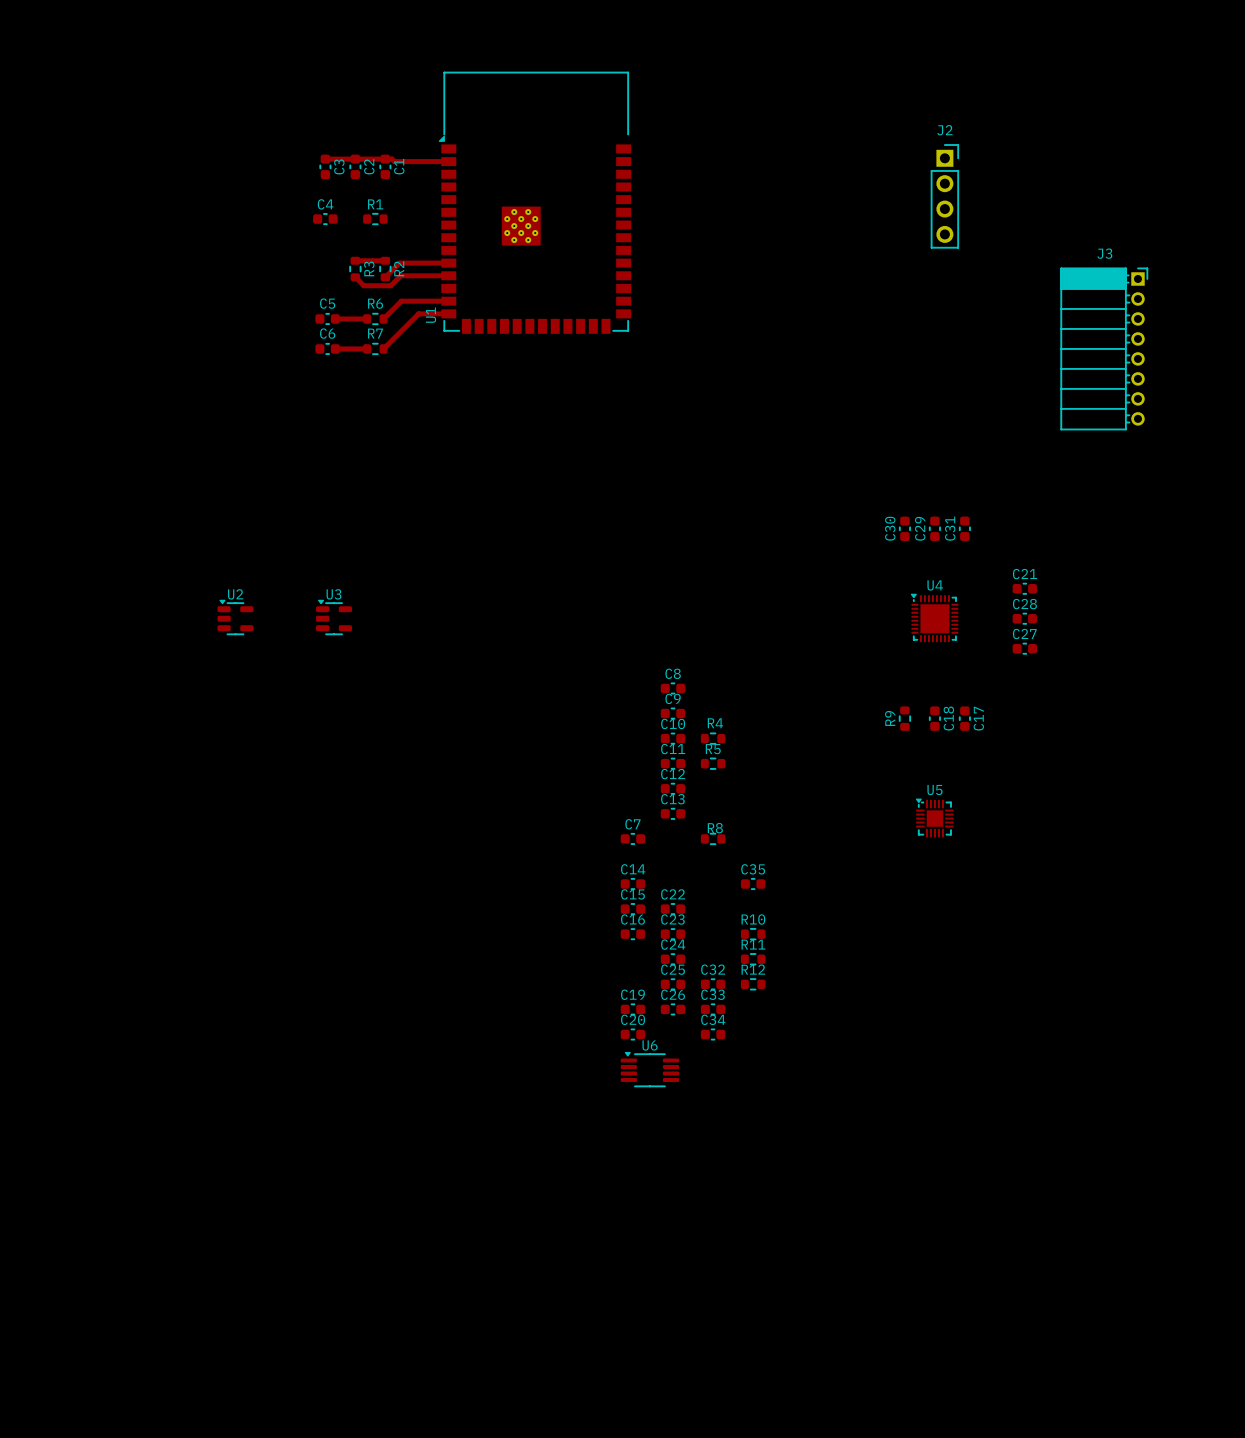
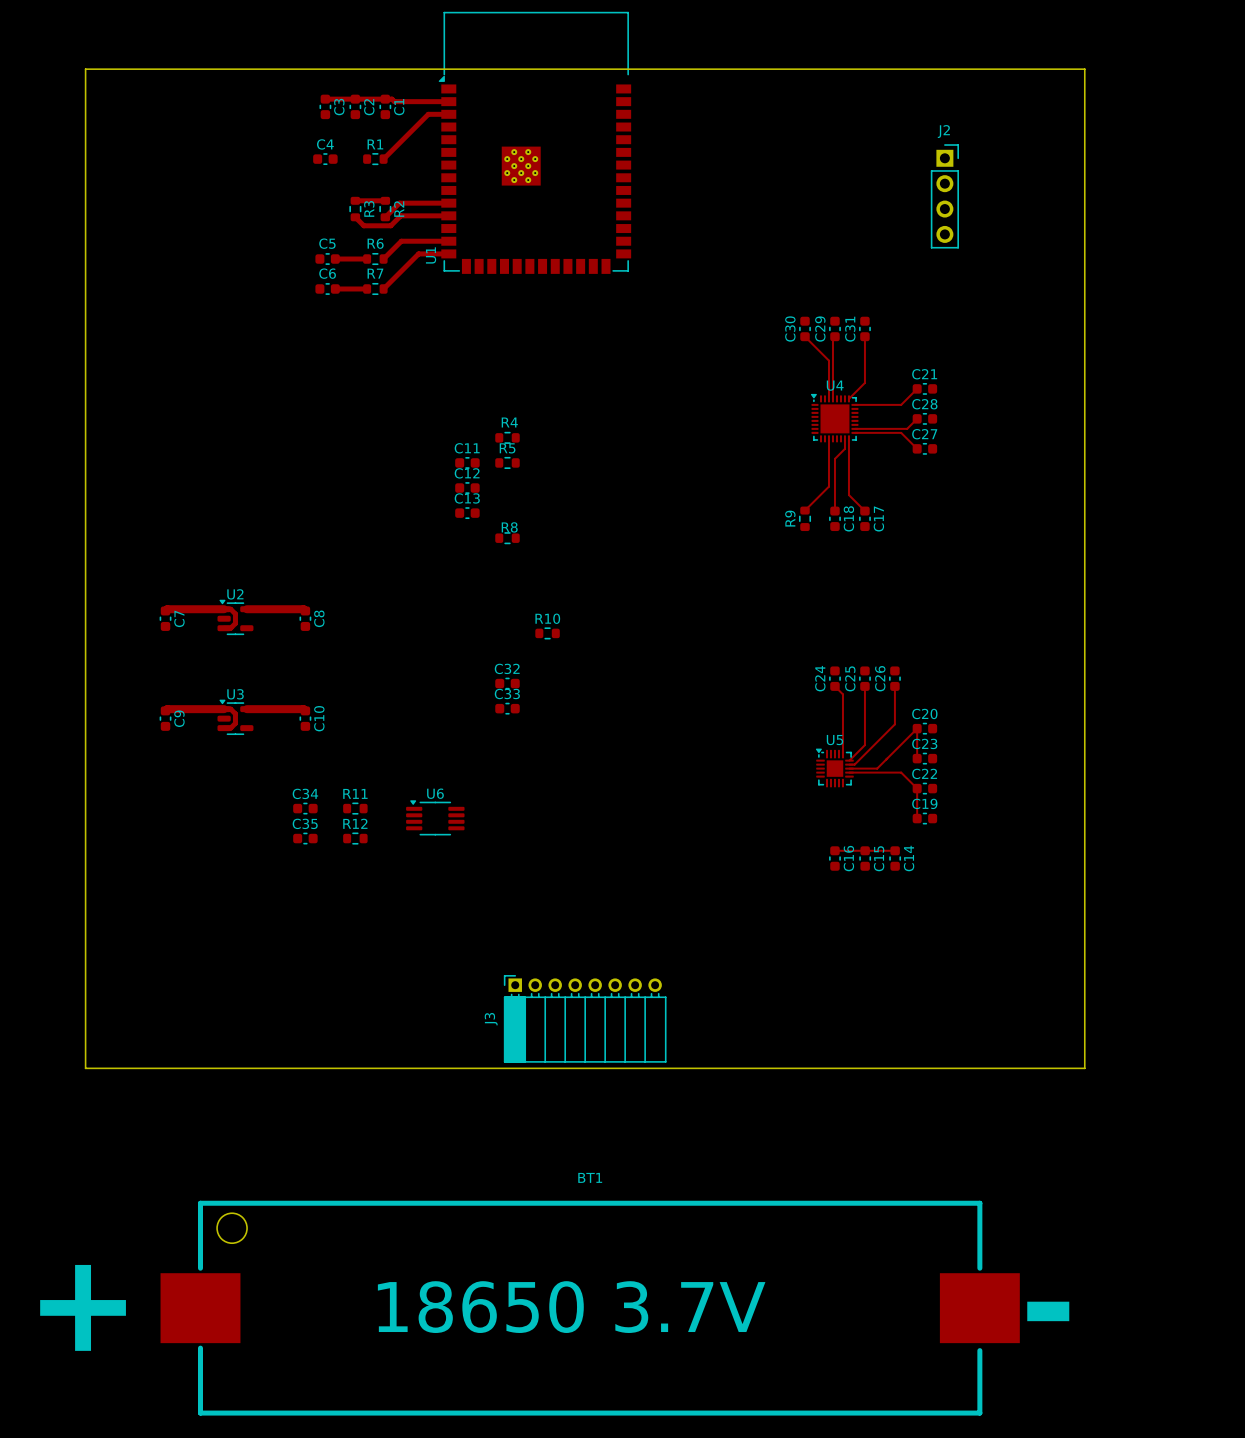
board edge: none -> (85, 69) (1084, 69) (1084, 1068) (85, 1068) (85, 69)
top track: none -> (448, 114) (428, 114) (383, 159)
top track: (325, 159) (448, 161) -> (325, 99) (448, 101)
C3 position: (325, 166) -> (325, 106)
C2 position: (355, 166) -> (355, 106)
C1 position: (385, 166) -> (385, 106)
U1 position: (534, 202) -> (534, 142)
C4 position: (325, 219) -> (325, 159)
R1 position: (375, 219) -> (375, 159)
top track: (355, 260) (385, 260) -> (355, 200) (385, 200)
top track: (448, 263) (399, 263) (385, 277) -> (448, 203) (399, 203) (385, 217)
R3 position: (355, 269) -> (355, 209)
R2 position: (385, 269) -> (385, 209)
top track: (448, 275) (400, 275) (390, 285) (363, 285) (355, 277) -> (448, 215) (400, 215) (390, 225) (363, 225) (355, 217)
top track: (448, 301) (401, 301) (383, 318) -> (448, 241) (401, 241) (383, 259)
top track: (448, 313) (418, 313) (383, 348) -> (448, 253) (418, 253) (383, 288)
C5 position: (327, 318) -> (327, 259)
top track: (335, 318) (367, 318) -> (335, 259) (367, 259)
R6 position: (375, 318) -> (375, 259)
top track: none -> (805, 336) (828, 360) (828, 398)
top track: none -> (834, 336) (832, 338) (832, 398)
top track: none -> (864, 336) (864, 382) (848, 398)
C6 position: (327, 348) -> (327, 288)
top track: (335, 348) (367, 348) -> (335, 288) (367, 288)
R7 position: (375, 348) -> (375, 288)
J3 rotation: 0° (1104, 348) -> 90° counterclockwise (585, 1018)
J3 position: (1104, 348) -> (585, 1018)
top track: none -> (917, 388) (901, 404) (854, 404)
top track: none -> (917, 418) (907, 428) (854, 428)
top track: none -> (854, 432) (901, 432) (917, 448)
top track: none -> (828, 438) (828, 486) (805, 510)
top track: none -> (844, 438) (844, 448) (834, 458) (834, 511)
top track: none -> (848, 438) (848, 495) (864, 511)
C30 position: (904, 528) -> (805, 328)
C29 position: (934, 528) -> (834, 328)
C31 position: (964, 528) -> (864, 328)
C21 position: (1024, 588) -> (924, 388)
top track: none -> (246, 609) (303, 609) (305, 610)
top track: none -> (165, 610) (167, 609) (230, 609) (235, 613) (235, 623) (230, 628) (224, 628)
U3 position: (334, 617) -> (235, 717)
U4 position: (934, 617) -> (834, 418)
C28 position: (1024, 618) -> (924, 418)
C27 position: (1024, 648) -> (924, 448)
top track: none -> (834, 686) (842, 694) (842, 754)
top track: none -> (864, 686) (864, 745) (849, 760)
top track: none -> (894, 686) (894, 724) (854, 764) (849, 764)
C8 rotation: 0° (673, 688) -> 90° clockwise (305, 618)
C8 position: (673, 688) -> (305, 618)
top track: none -> (246, 709) (303, 709) (305, 710)
top track: none -> (165, 710) (167, 709) (230, 709) (235, 713) (235, 723) (230, 728) (224, 728)
C9 rotation: 0° (673, 713) -> 90° clockwise (165, 718)
C9 position: (673, 713) -> (165, 718)
R9 position: (904, 718) -> (805, 518)
C18 position: (934, 718) -> (834, 518)
C17 position: (964, 718) -> (864, 518)
C10 rotation: 0° (673, 738) -> 90° clockwise (305, 718)
C10 position: (673, 738) -> (305, 718)
R4 position: (713, 738) -> (507, 437)
top track: none -> (917, 758) (917, 728) (877, 768) (849, 768)
C11 position: (673, 763) -> (467, 462)
R5 position: (713, 763) -> (507, 462)
top track: none -> (849, 772) (901, 772) (917, 788) (917, 818)
C12 position: (673, 788) -> (467, 488)
C13 position: (673, 813) -> (467, 513)
U5 position: (934, 817) -> (834, 767)
C7 rotation: 0° (632, 838) -> 90° clockwise (165, 618)
C7 position: (632, 838) -> (165, 618)
R8 position: (713, 838) -> (507, 538)
top track: none -> (834, 850) (895, 850)
C14 rotation: 0° (632, 884) -> 90° clockwise (895, 858)
C14 position: (632, 884) -> (895, 858)
C35 position: (753, 884) -> (305, 838)
C15 rotation: 0° (632, 909) -> 90° clockwise (865, 858)
C15 position: (632, 909) -> (865, 858)
C22 position: (673, 909) -> (924, 788)
C16 rotation: 0° (632, 934) -> 90° clockwise (834, 858)
C16 position: (632, 934) -> (834, 858)
C23 position: (673, 934) -> (924, 758)
R10 position: (753, 934) -> (547, 633)
C24 name position: C24 (673, 944) -> C24 (820, 678)
C24 rotation: 0° (673, 959) -> 90° clockwise (834, 678)
C24 position: (673, 959) -> (834, 678)
R11 position: (753, 959) -> (355, 808)
C25 name position: C25 (673, 969) -> C25 (850, 678)
C25 rotation: 0° (673, 984) -> 90° clockwise (864, 678)
C25 position: (673, 984) -> (864, 678)
C32 position: (713, 984) -> (507, 683)
R12 position: (753, 984) -> (355, 838)
C26 name position: C26 (673, 994) -> C26 (880, 678)
C19 position: (632, 1009) -> (924, 818)
C26 rotation: 0° (673, 1009) -> 90° clockwise (894, 678)
C26 position: (673, 1009) -> (894, 678)
C33 position: (713, 1009) -> (507, 708)
C20 position: (632, 1034) -> (924, 728)
C34 position: (713, 1034) -> (305, 808)
U6 position: (649, 1069) -> (435, 817)
BT1: none -> (590, 1308)

